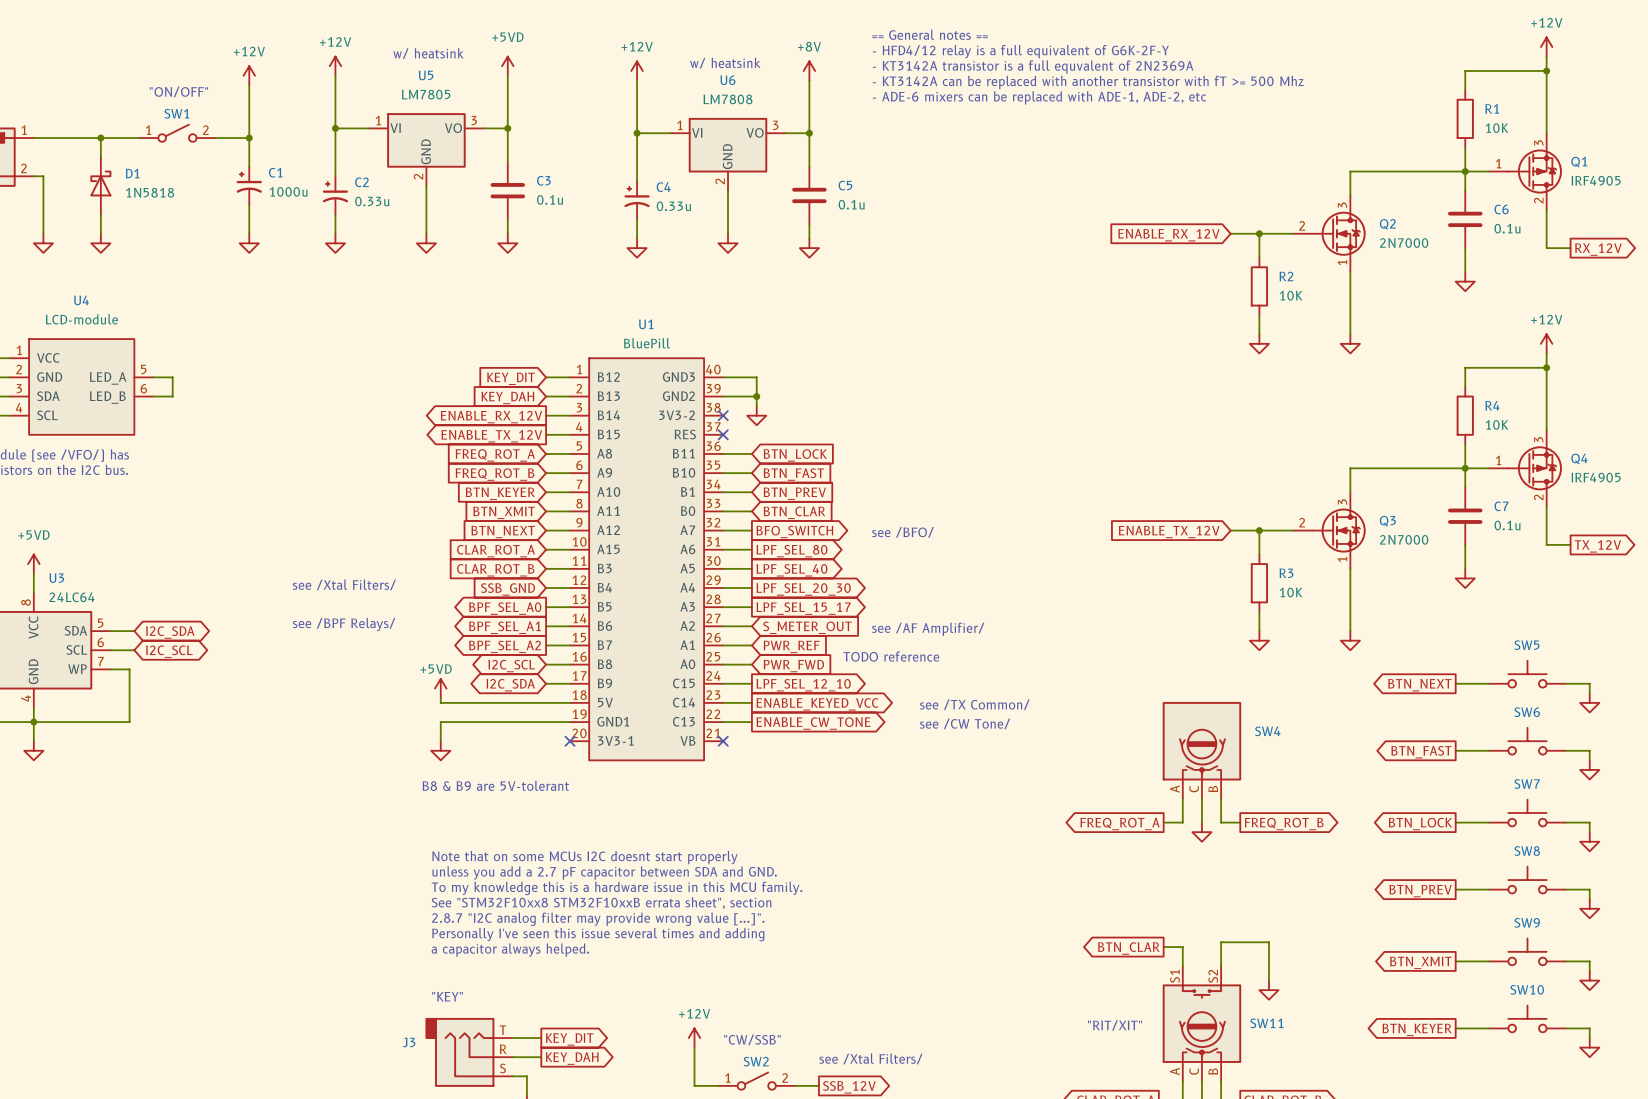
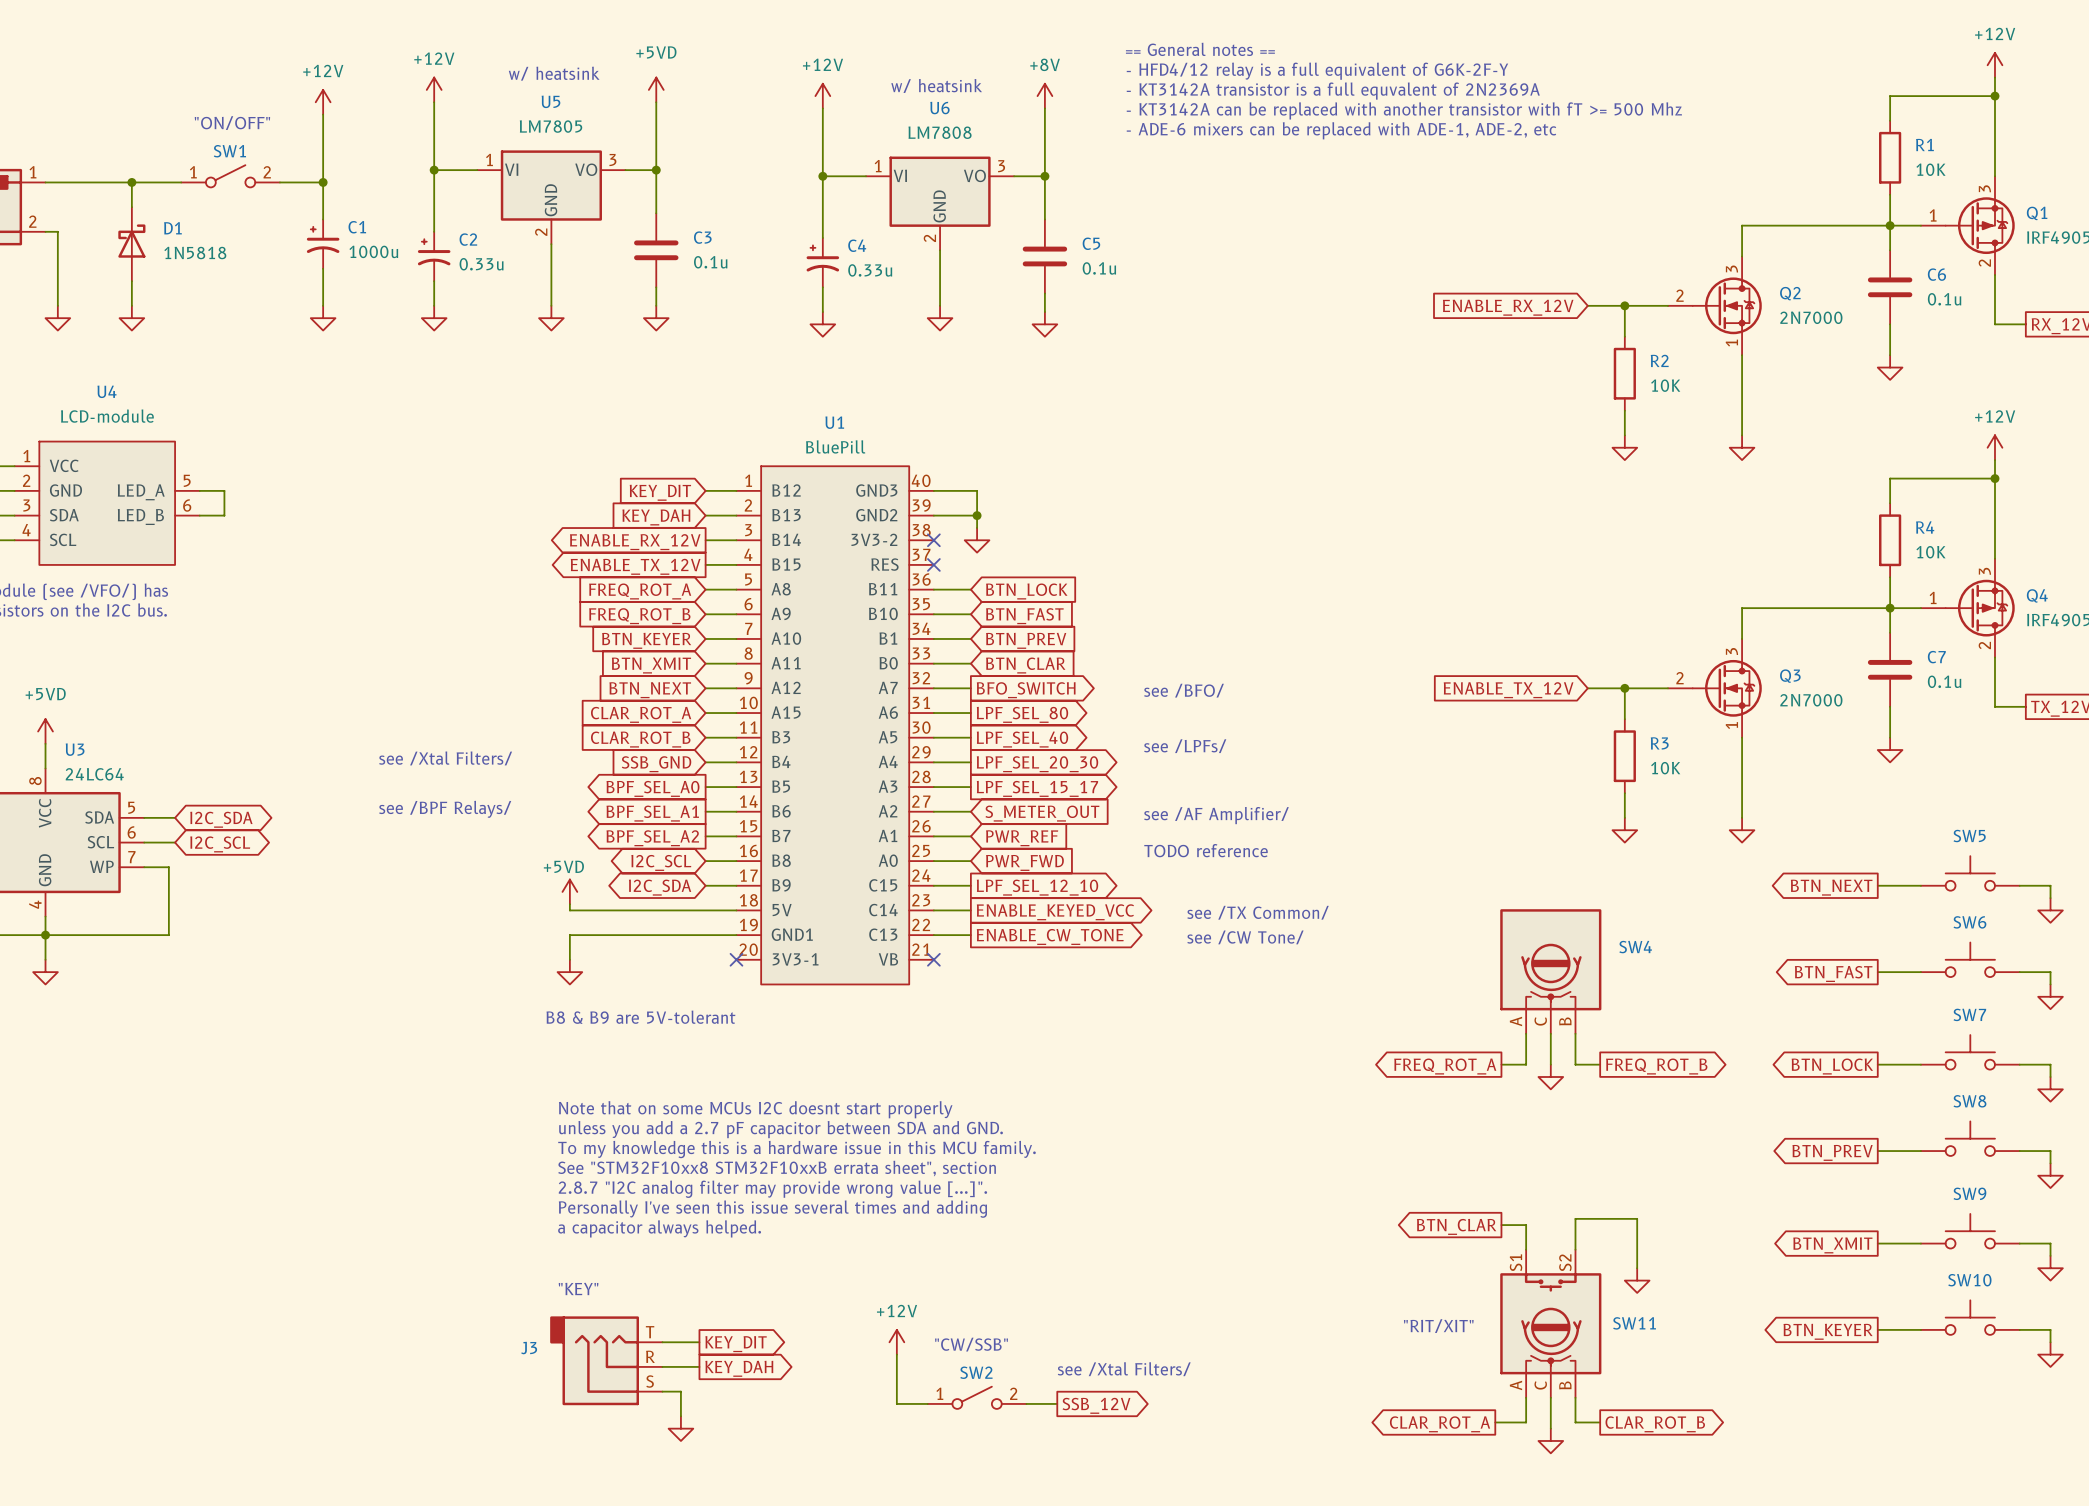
text position: see /BFO/ (902, 532) -> see /BFO/ (1184, 690)
text: none -> see /LPFs/ (1185, 746)
text position: see /AF Amplifier/ (928, 629) -> see /AF Amplifier/ (1216, 815)
text position: TODO reference (891, 656) -> TODO reference (1206, 850)

